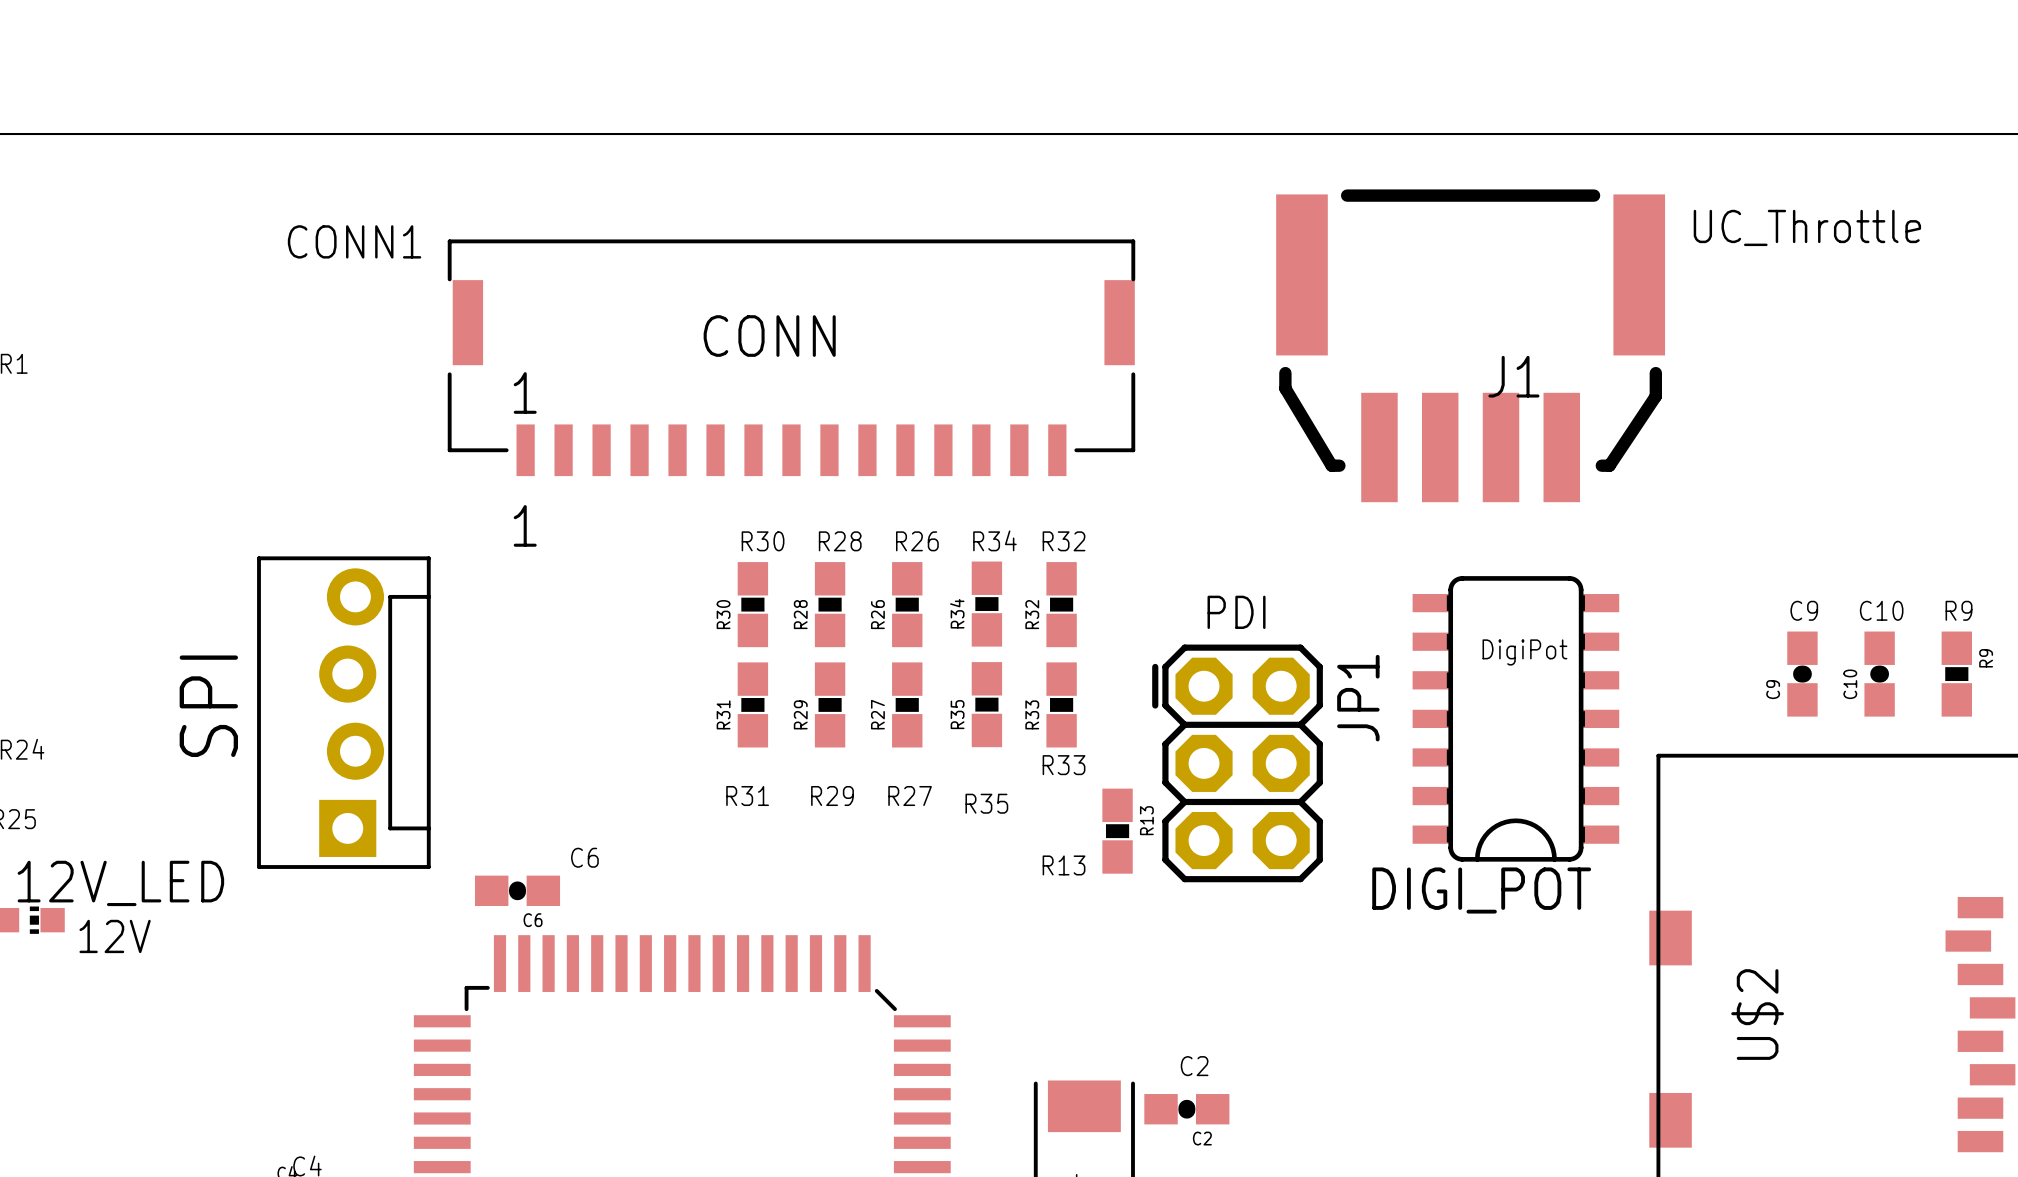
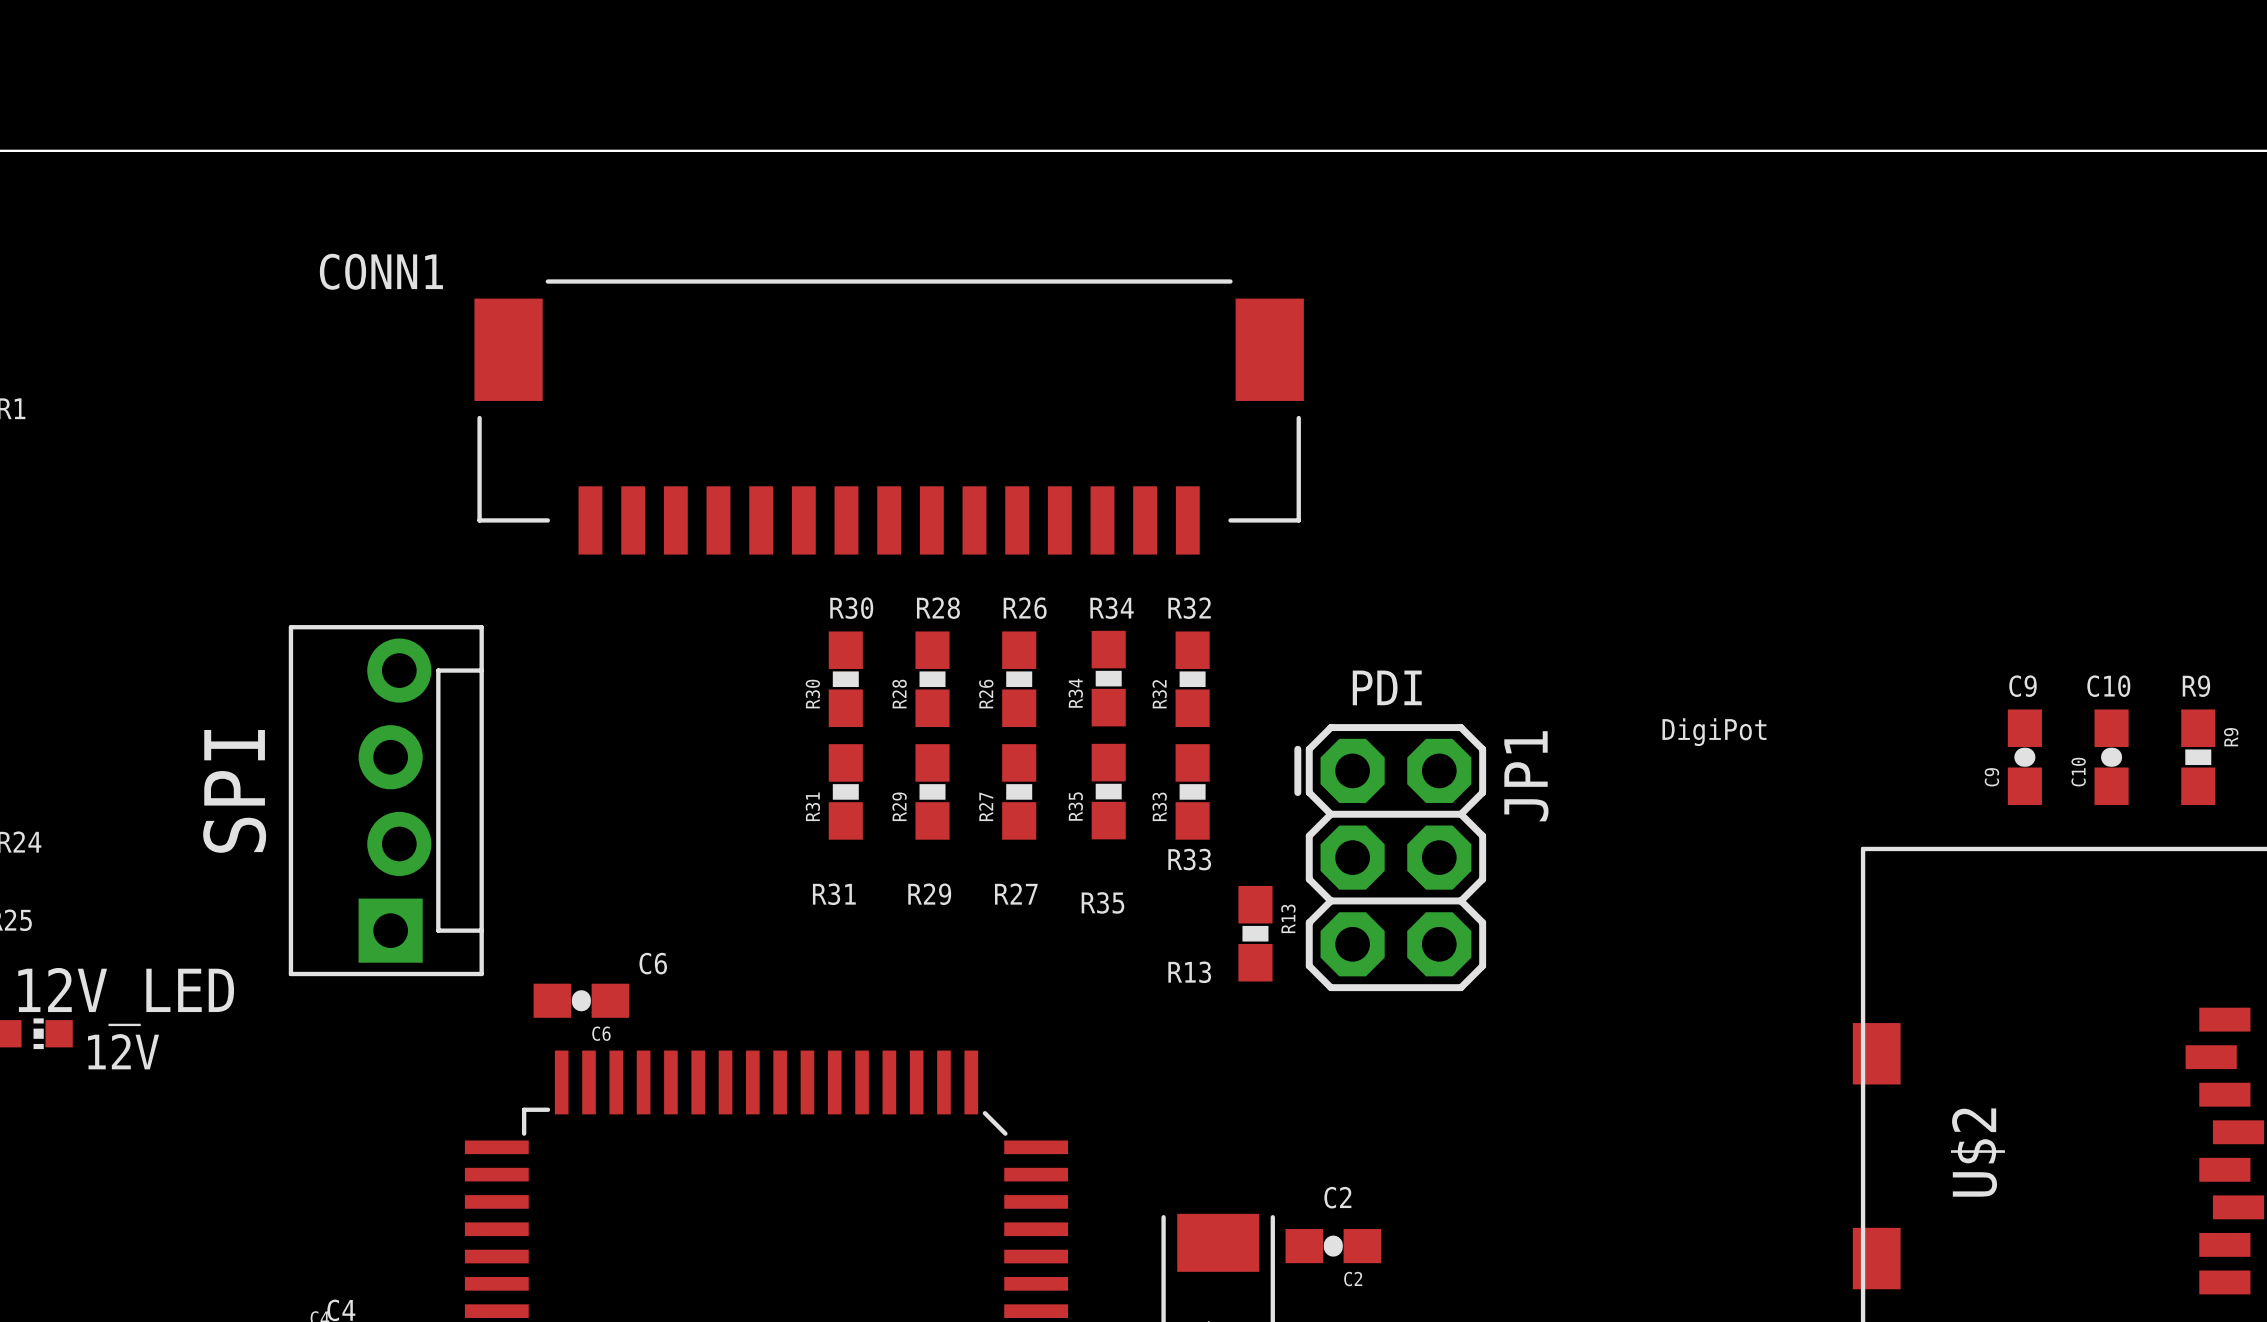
line: (1347, 195) (1594, 195) -> none
text: UC_Throttle (1807, 227) -> none
part footprint: [447, 239, 1136, 477] -> [474, 279, 1304, 555]
J1: (1470, 348) -> none
line: (1285, 373) (1285, 388) (1331, 465) (1339, 465) -> none
line: (1655, 373) (1655, 396) (1609, 465) (1601, 465) -> none
DIGI_POT: (1515, 718) -> none

